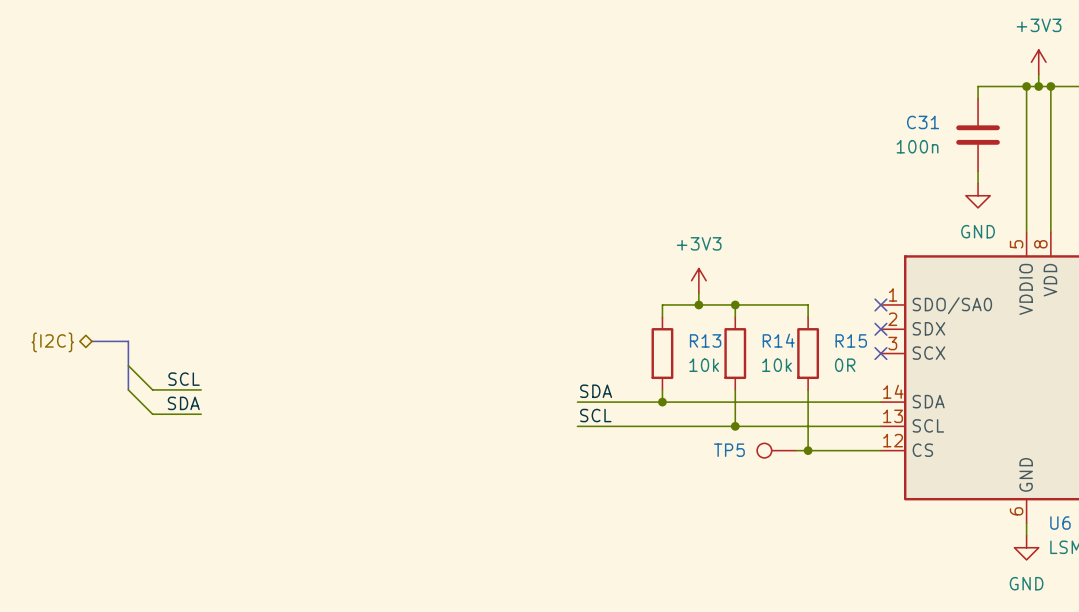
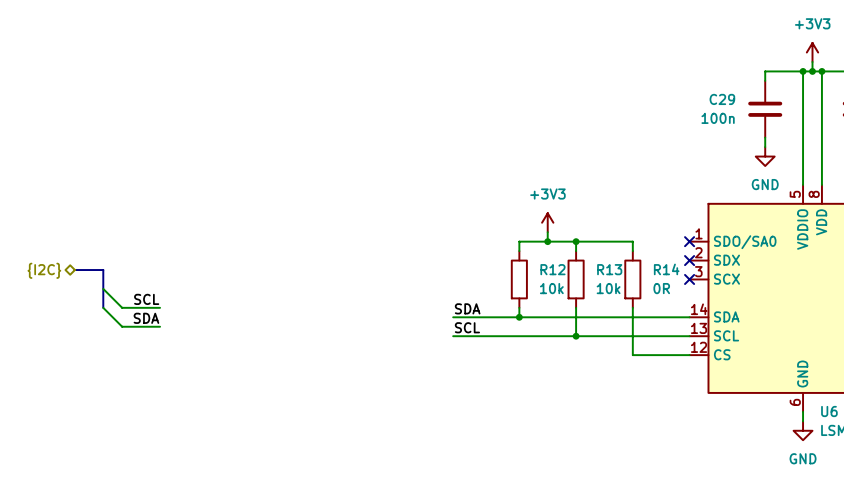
C31 name: C31 (923, 122) -> C29 (722, 99)
R13 name: R13 (705, 340) -> R12 (552, 269)
R14 name: R14 (778, 340) -> R13 (609, 269)
R15 name: R15 (851, 340) -> R14 (666, 269)
TP5: (776, 450) -> none
wire: (795, 450) (808, 450) -> none
junction: (808, 450) -> none

